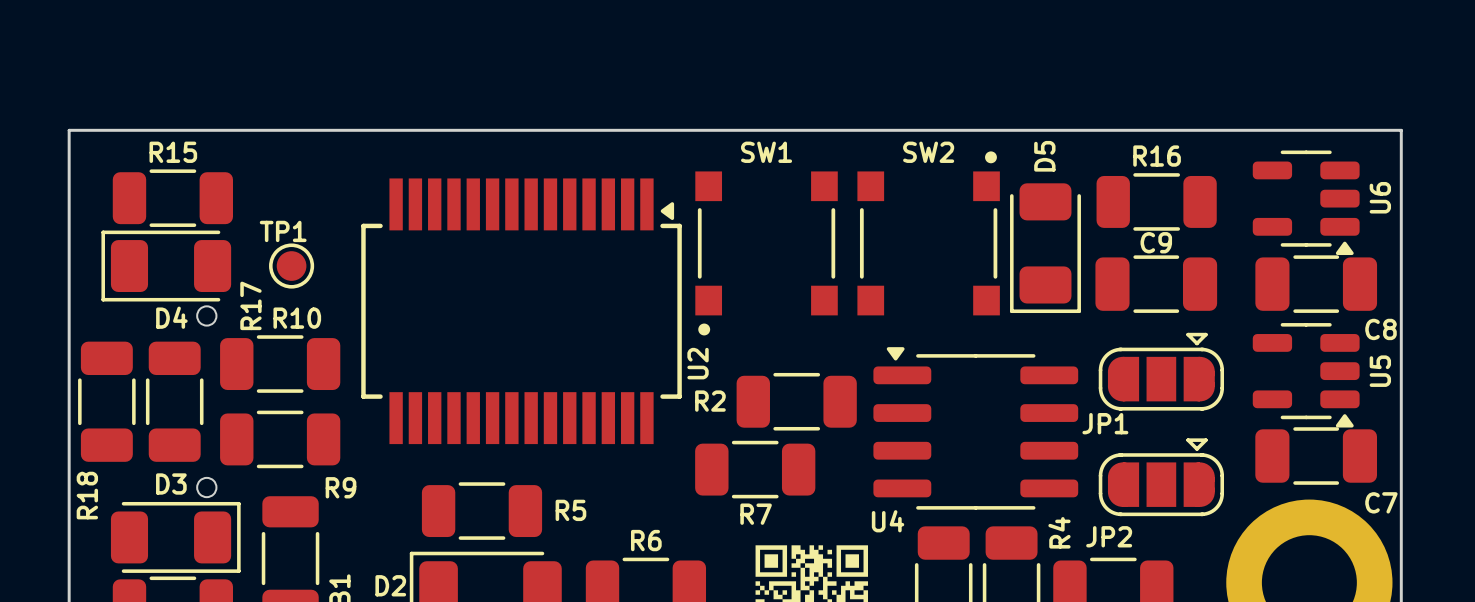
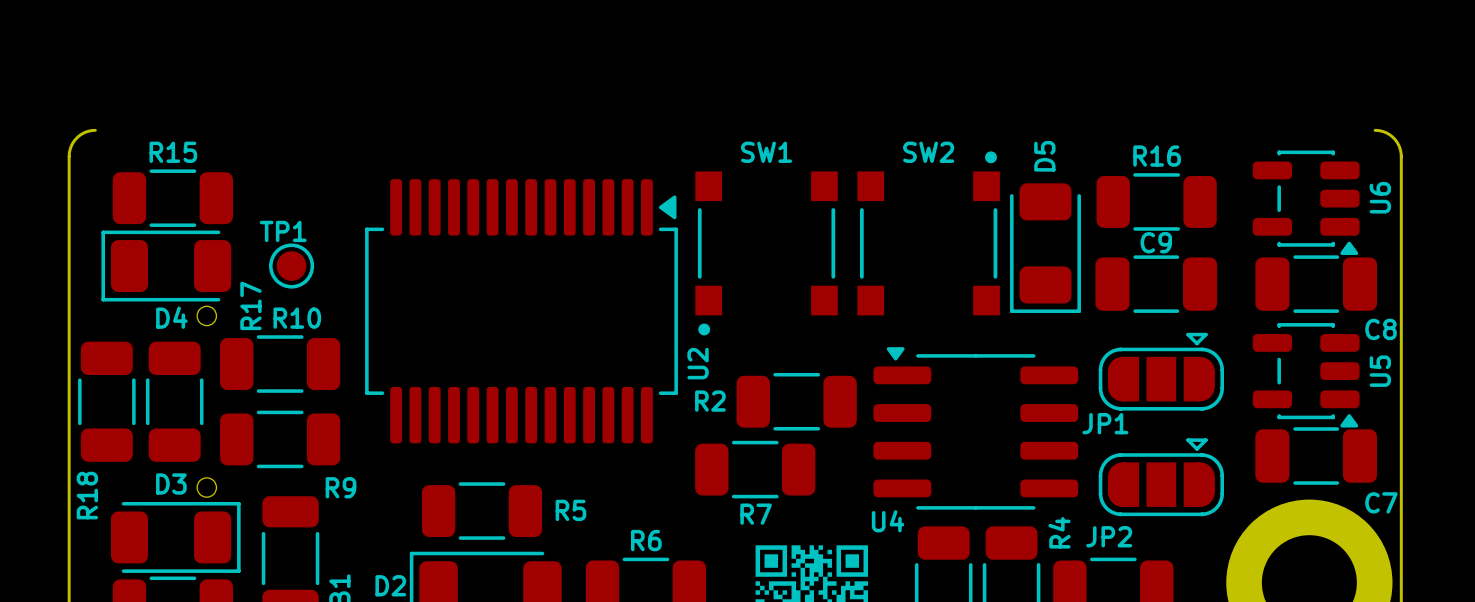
board edge: none -> (1375, 130) (1383, 131) (1393, 137) (1398, 145) (1401, 156)
U6 footprint: [1252, 150, 1360, 256] -> [1252, 150, 1360, 256]
board edge: (69, 156) (69, 130) (1401, 130) (1401, 156) -> (69, 156) (71, 145) (76, 137) (86, 131) (95, 130)
U2 footprint: [361, 178, 682, 445] -> [365, 179, 678, 444]
U5 footprint: [1252, 323, 1360, 428] -> [1252, 323, 1360, 428]

